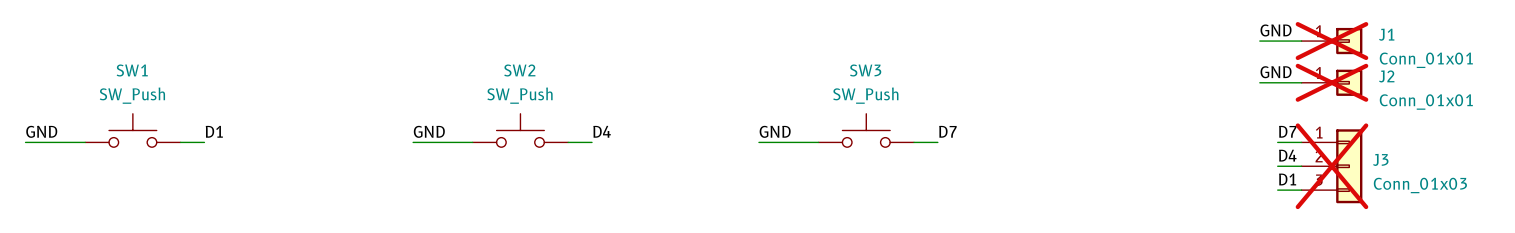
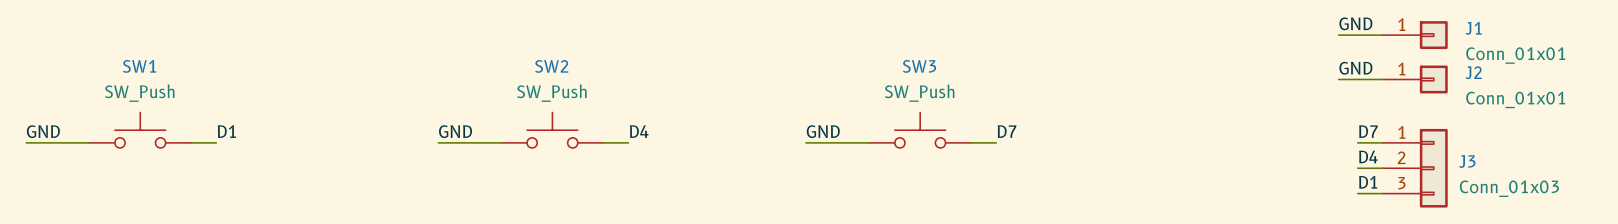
J1 do-not-place cross: (1331, 41) -> none
J2 do-not-place cross: (1331, 82) -> none
J3 do-not-place cross: (1331, 166) -> none

